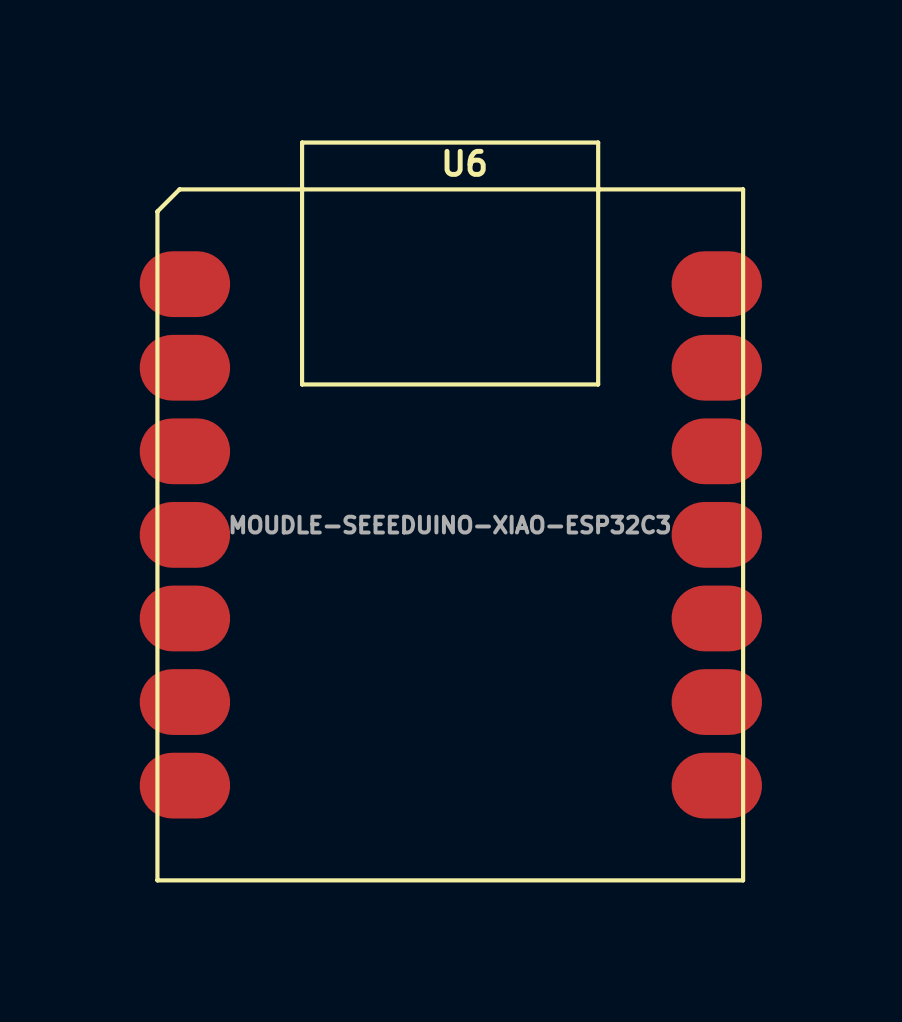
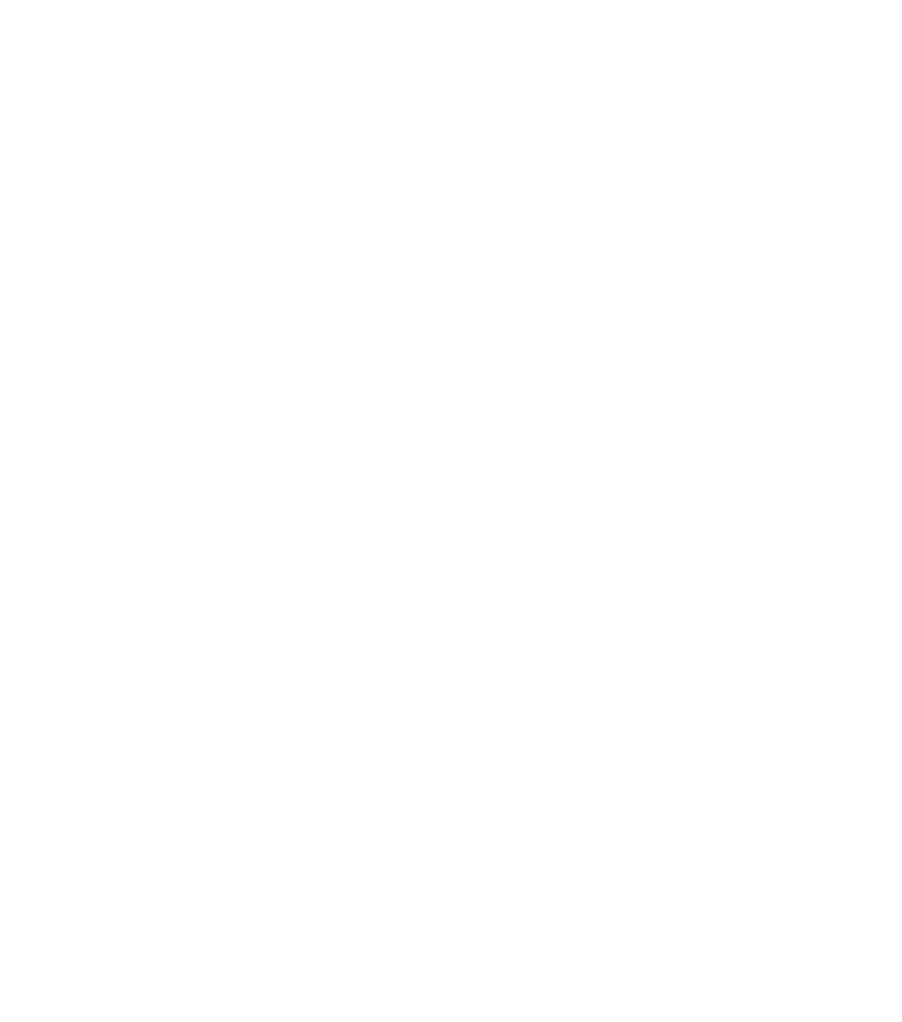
U6: MOUDLE-SEEEDUINO-XIAO-ESP32C3 (450, 511) -> none

